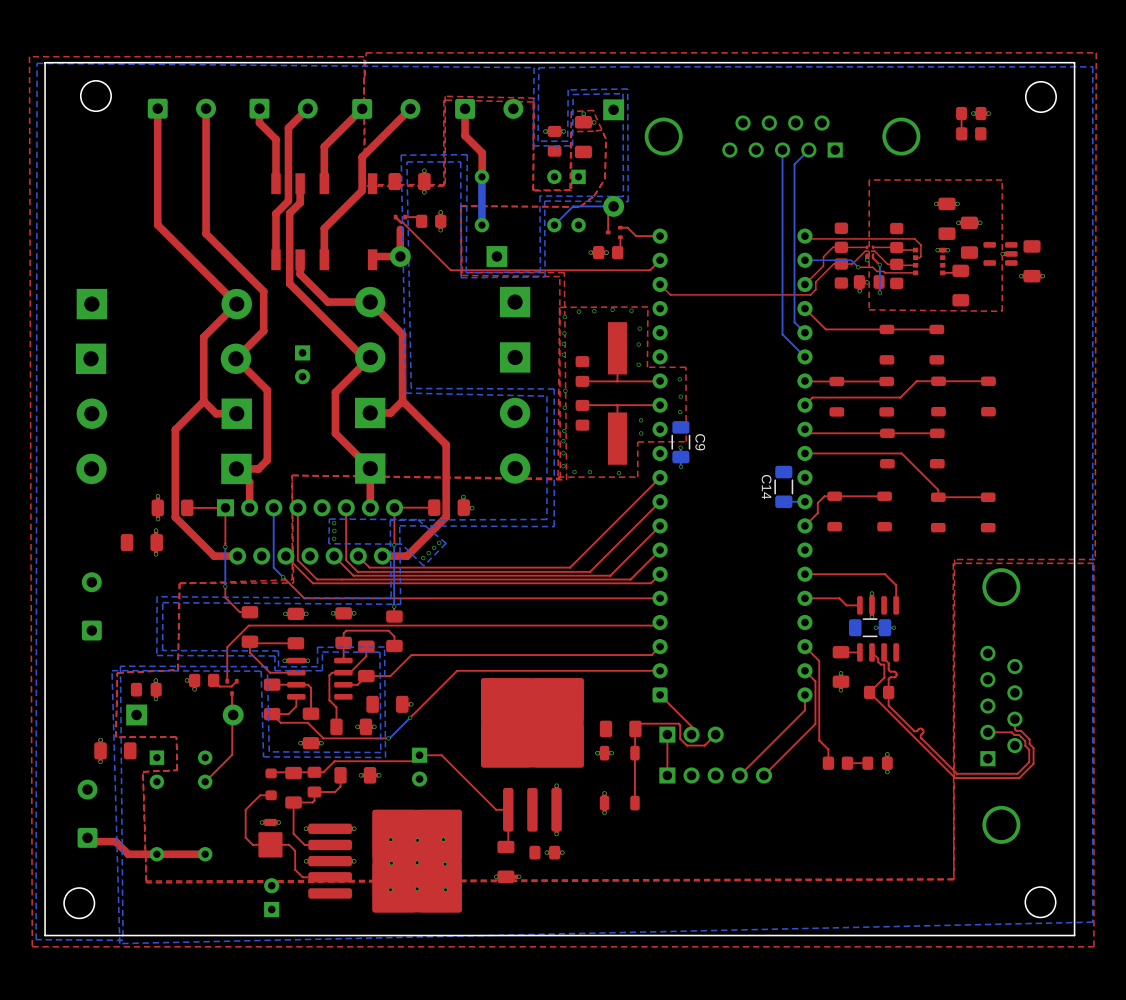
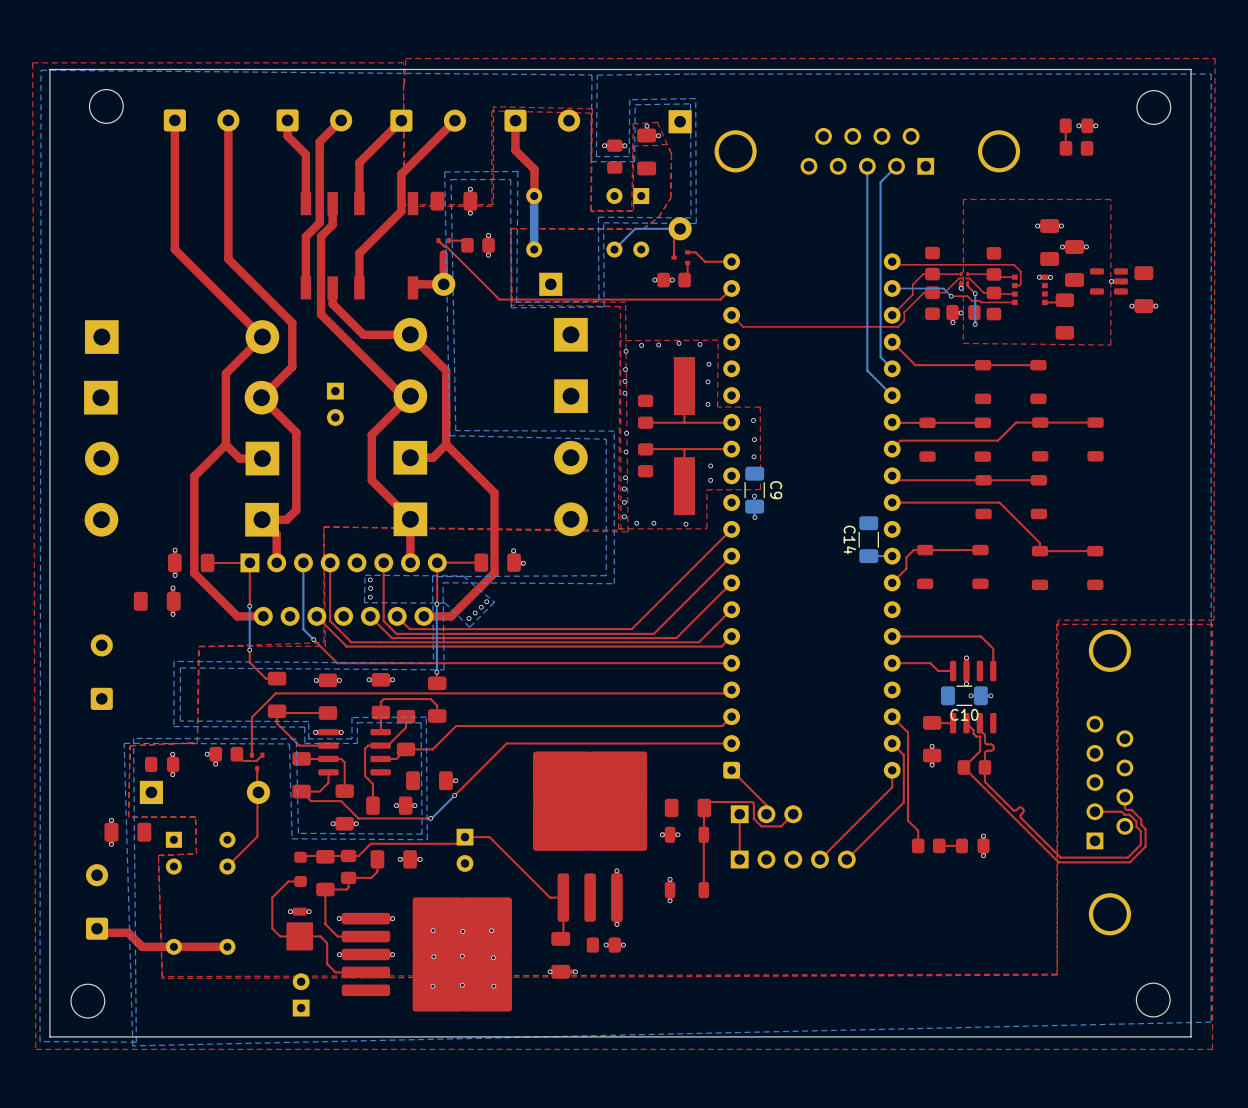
C10 name: none -> C10 (964, 714)

